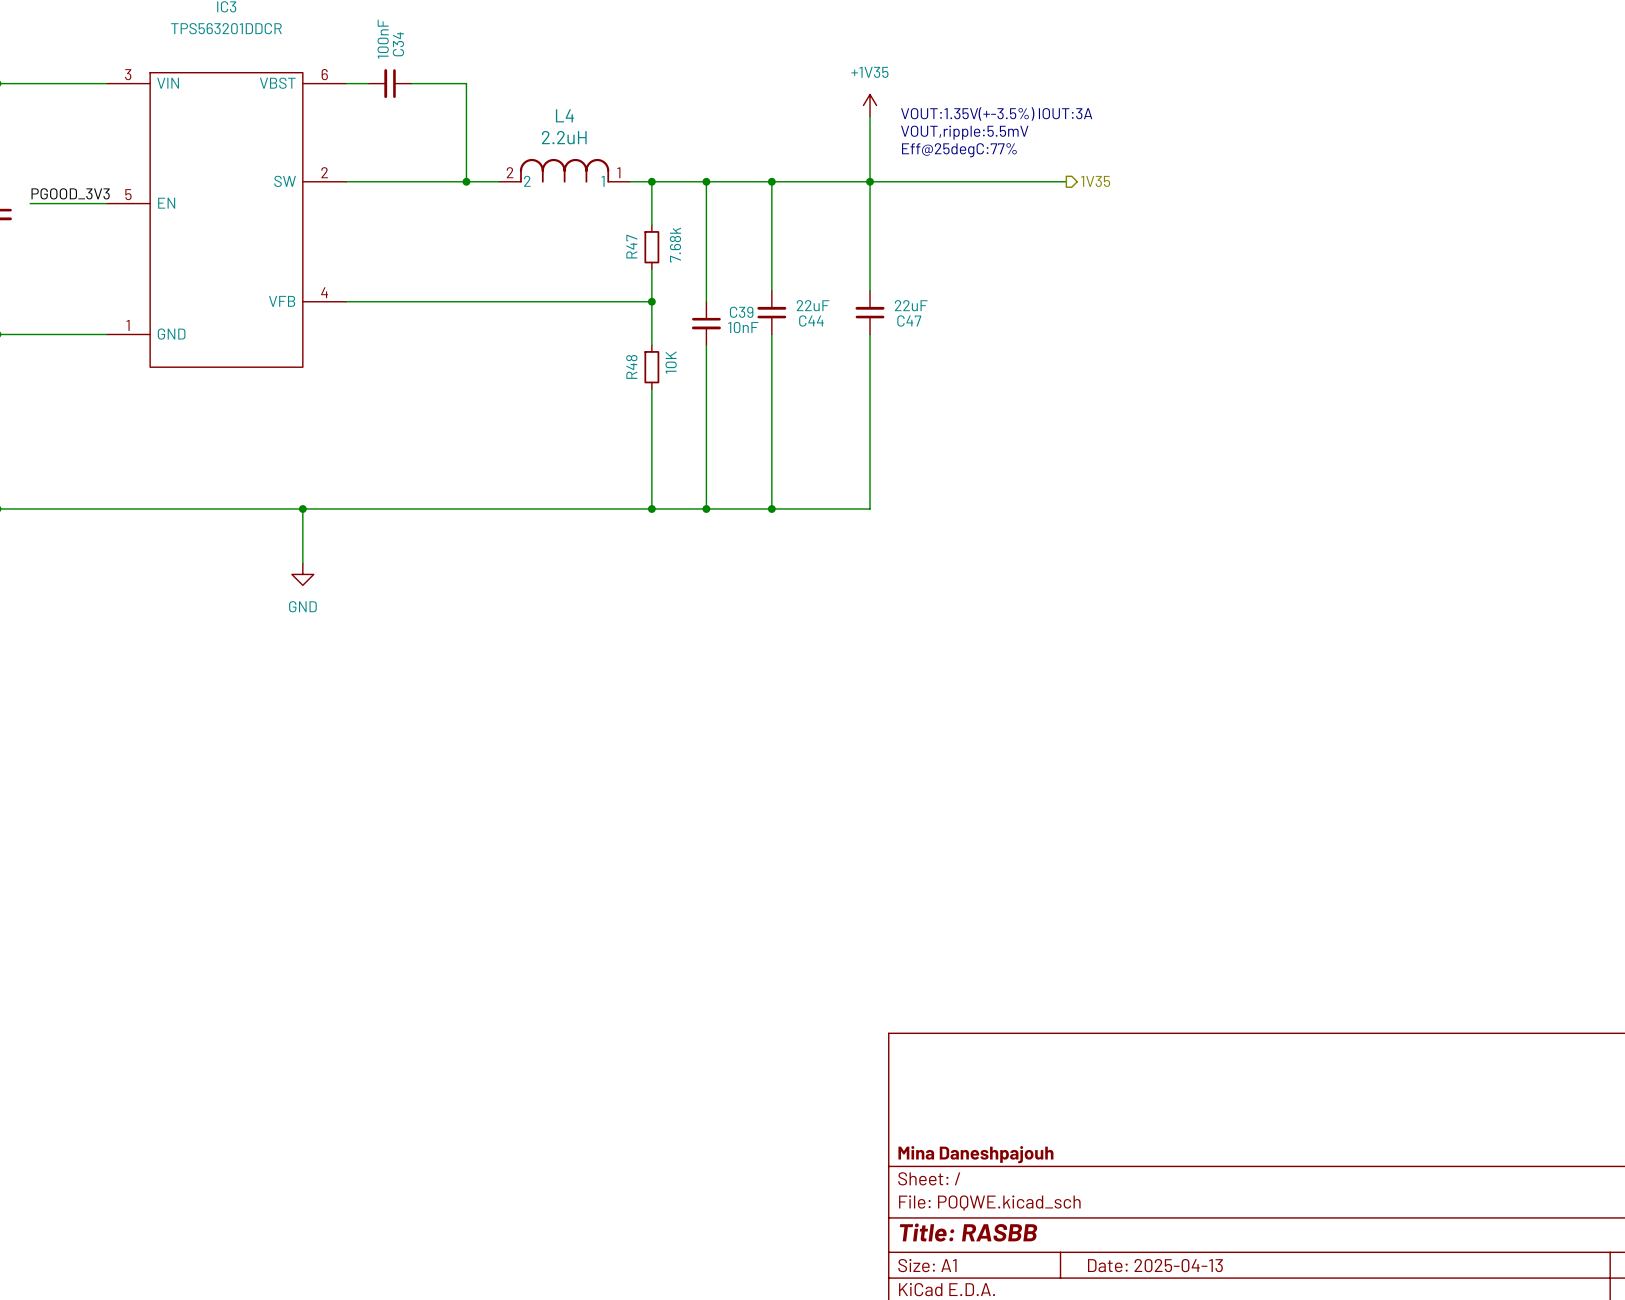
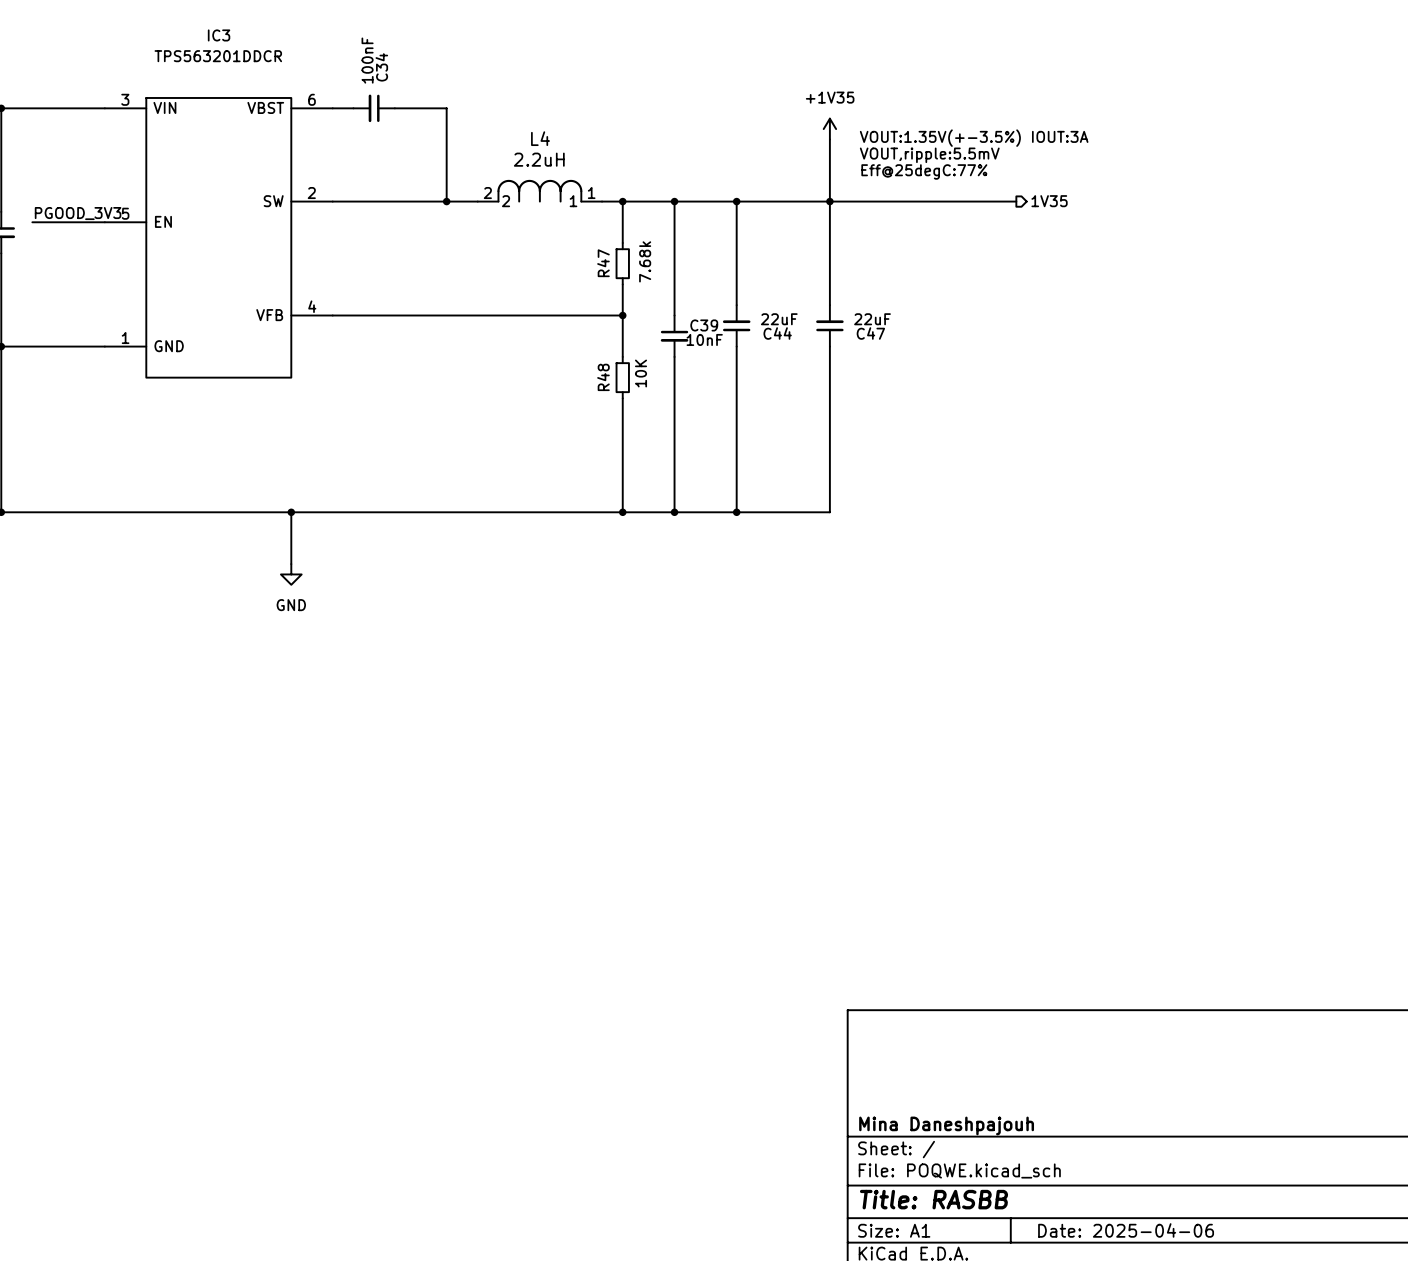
title block: Date: 2025-04-13 (1155, 1265) -> Date: 2025-04-06 (1126, 1230)

